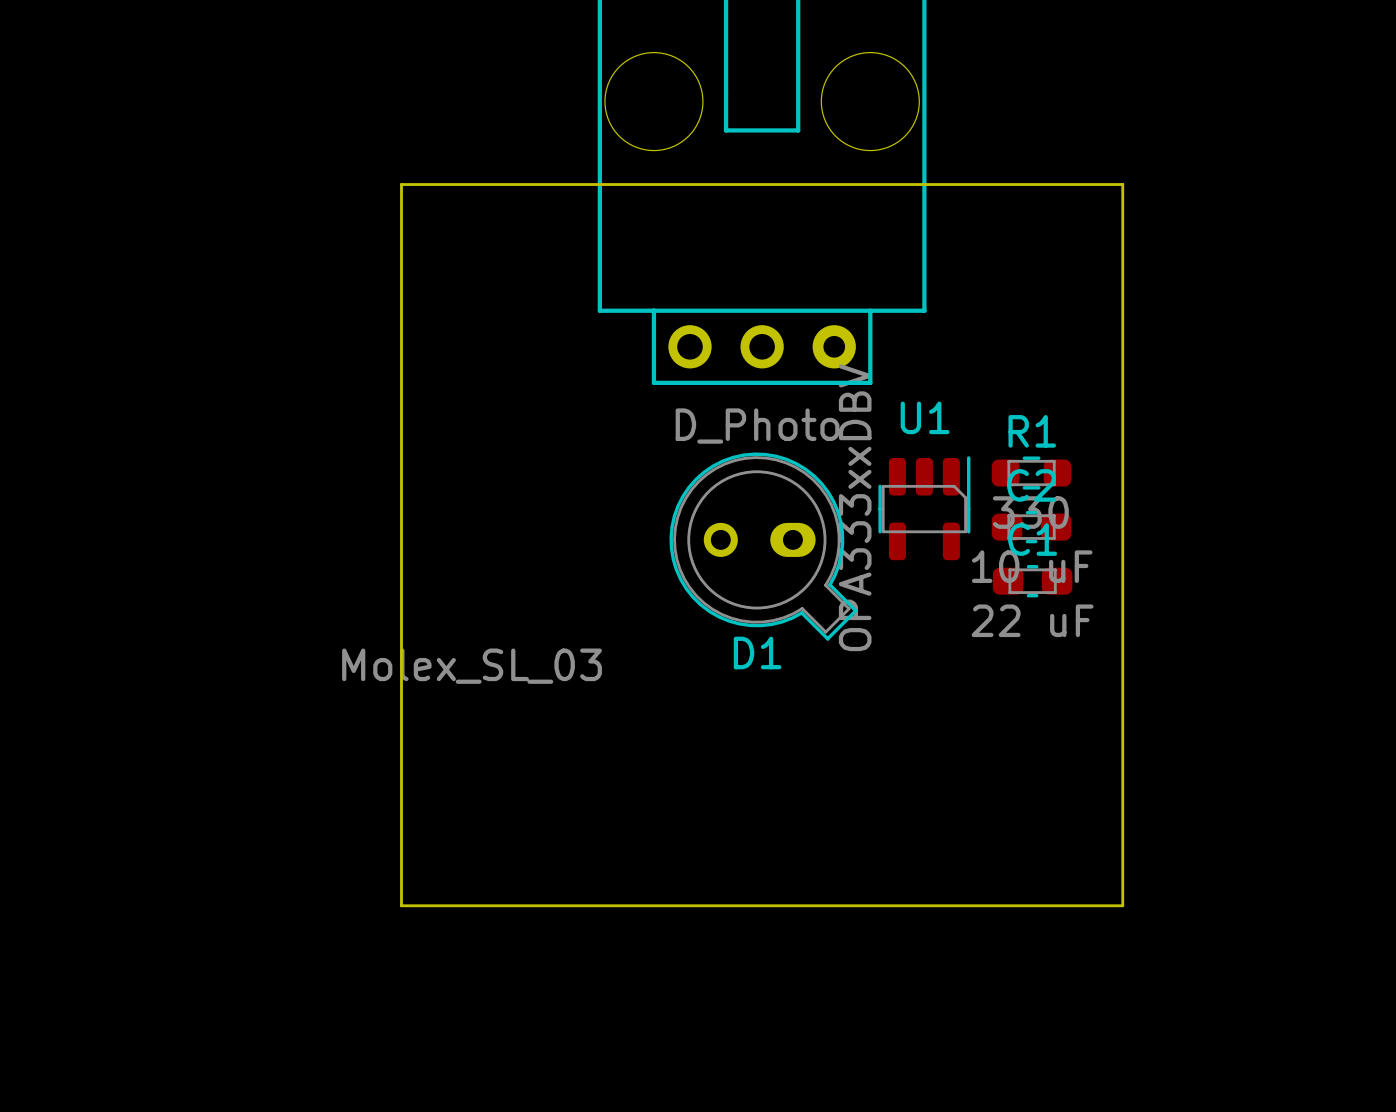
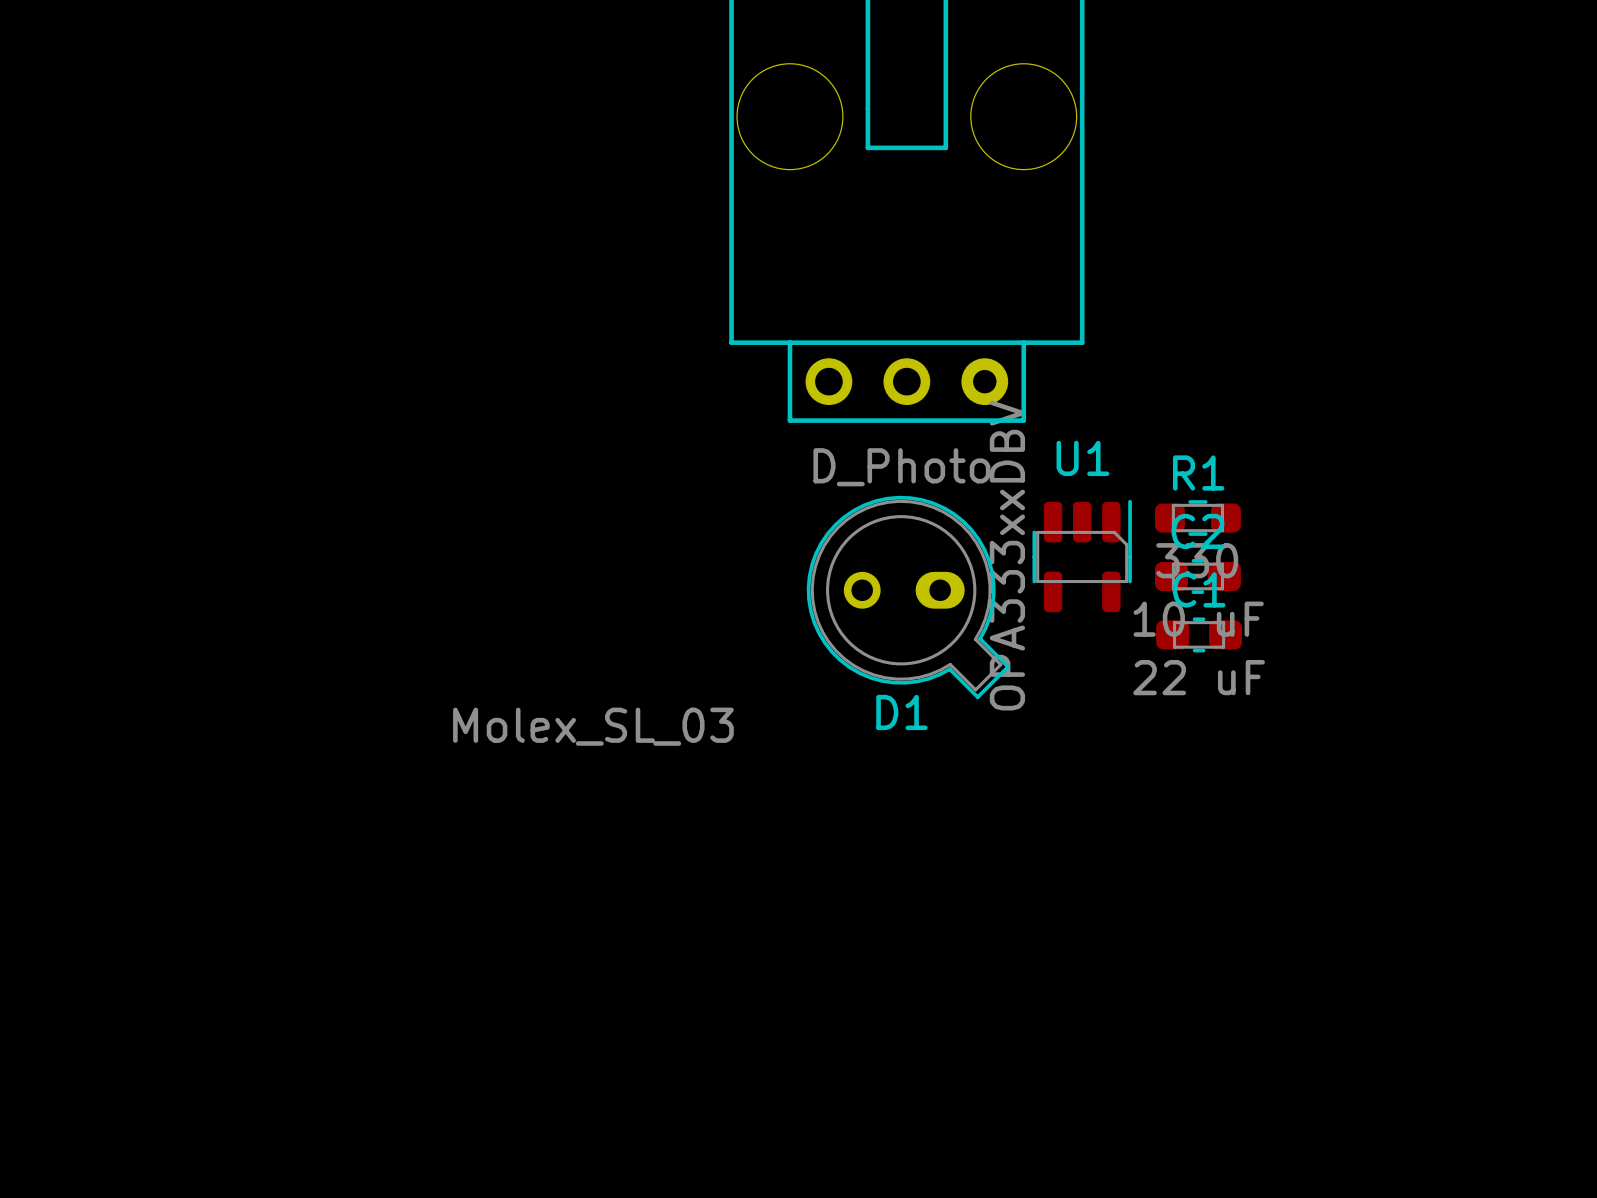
board edge: (401, 184) (1122, 184) (1122, 905) (401, 905) (401, 184) -> none

